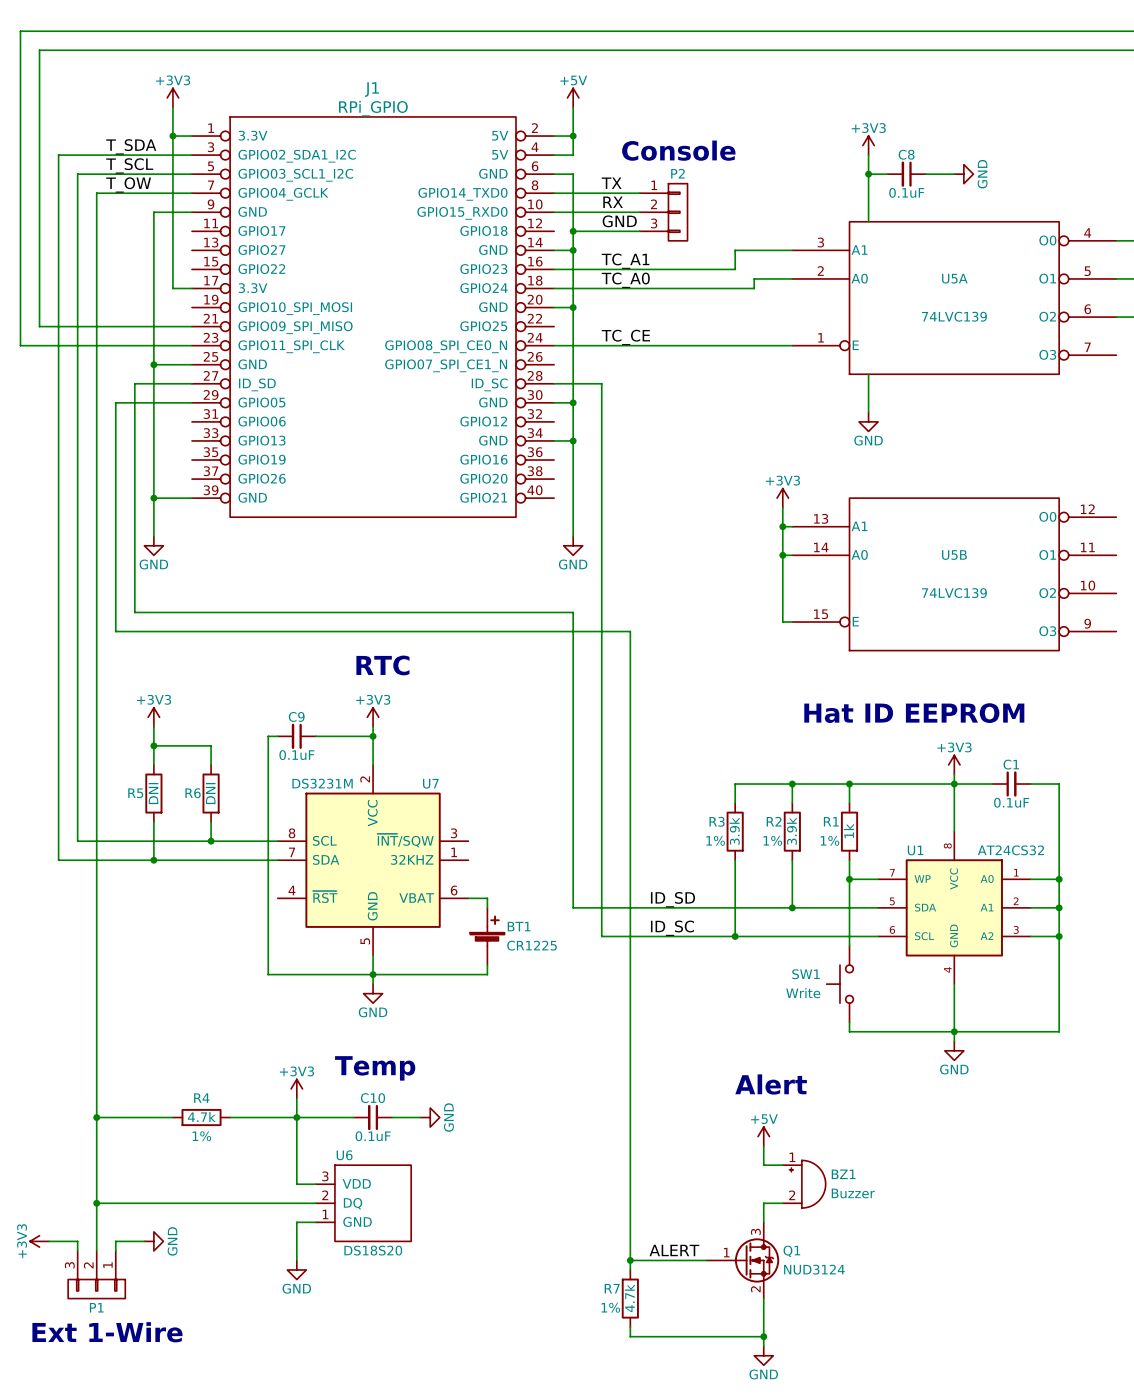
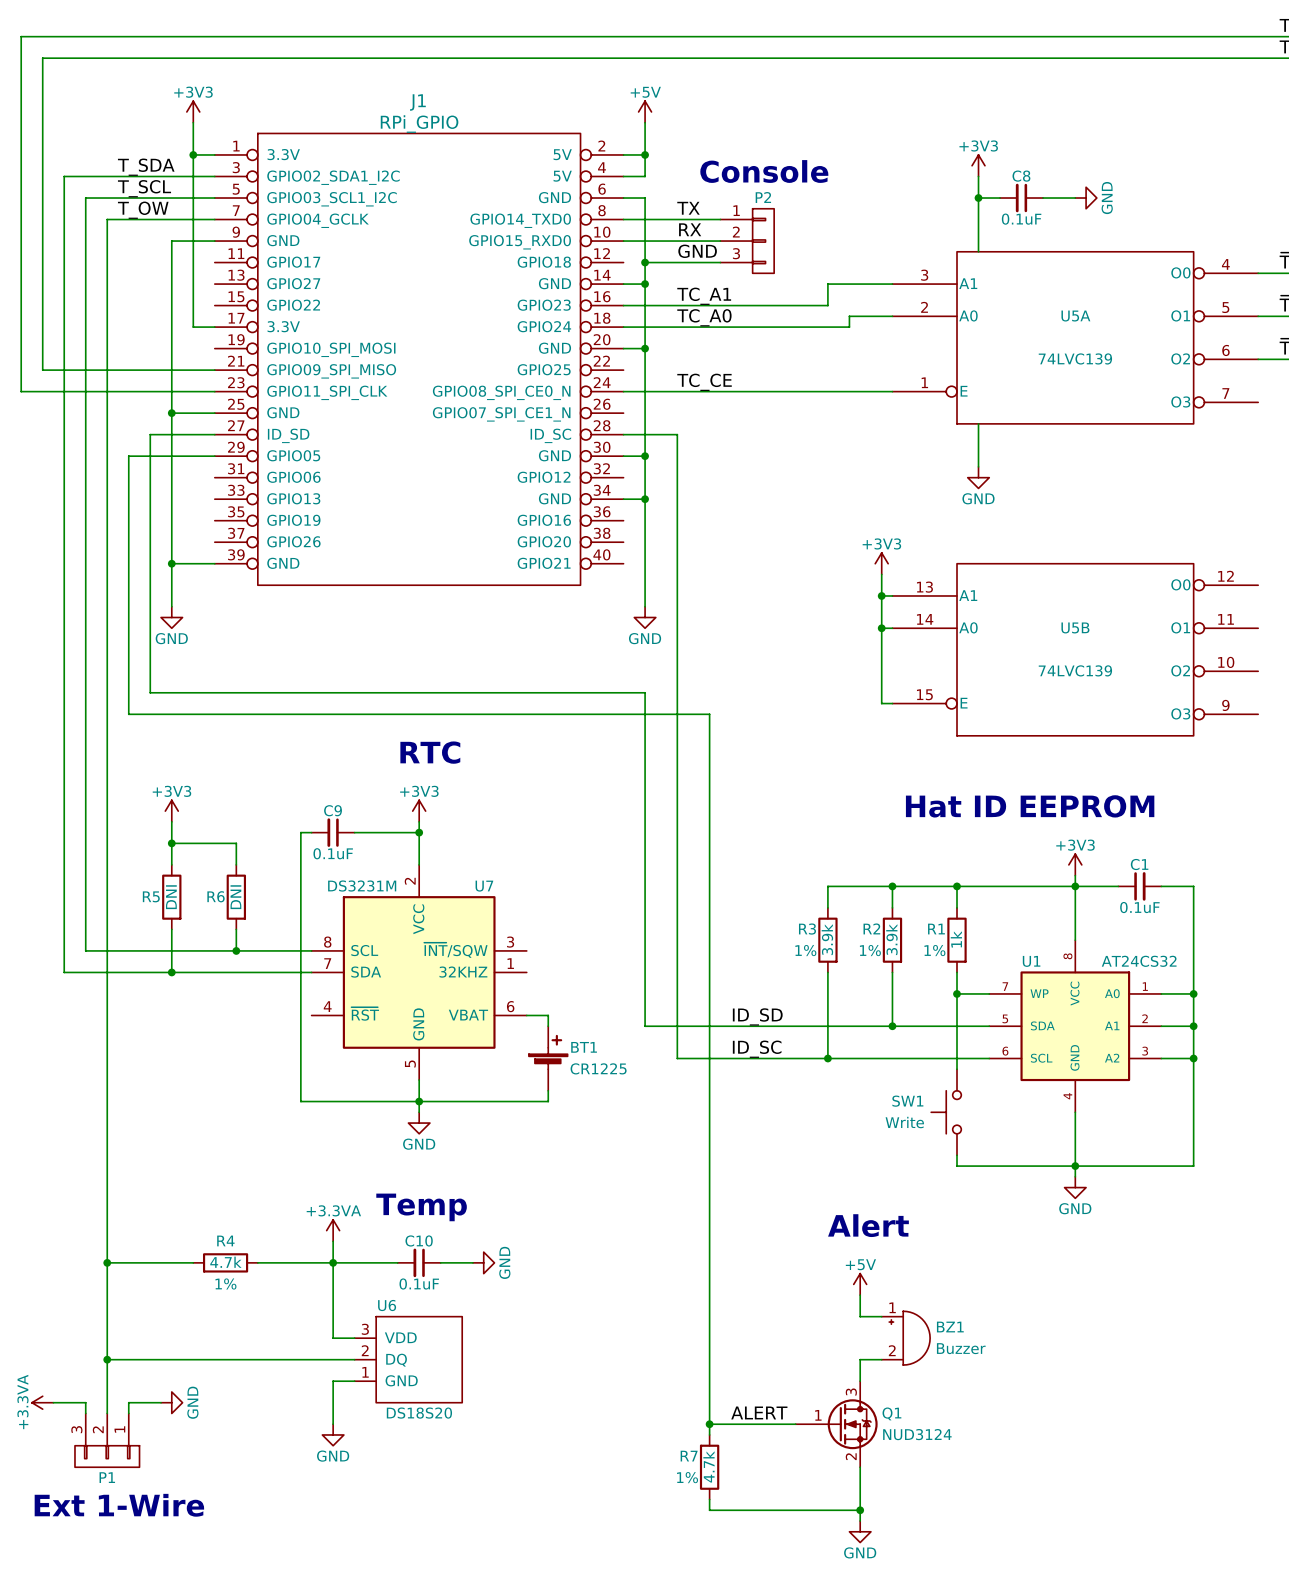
power symbol: +3V3 (296, 1088) -> +3.3VA (333, 1230)
power symbol: +3V3 (39, 1241) -> +3.3VA (42, 1402)

